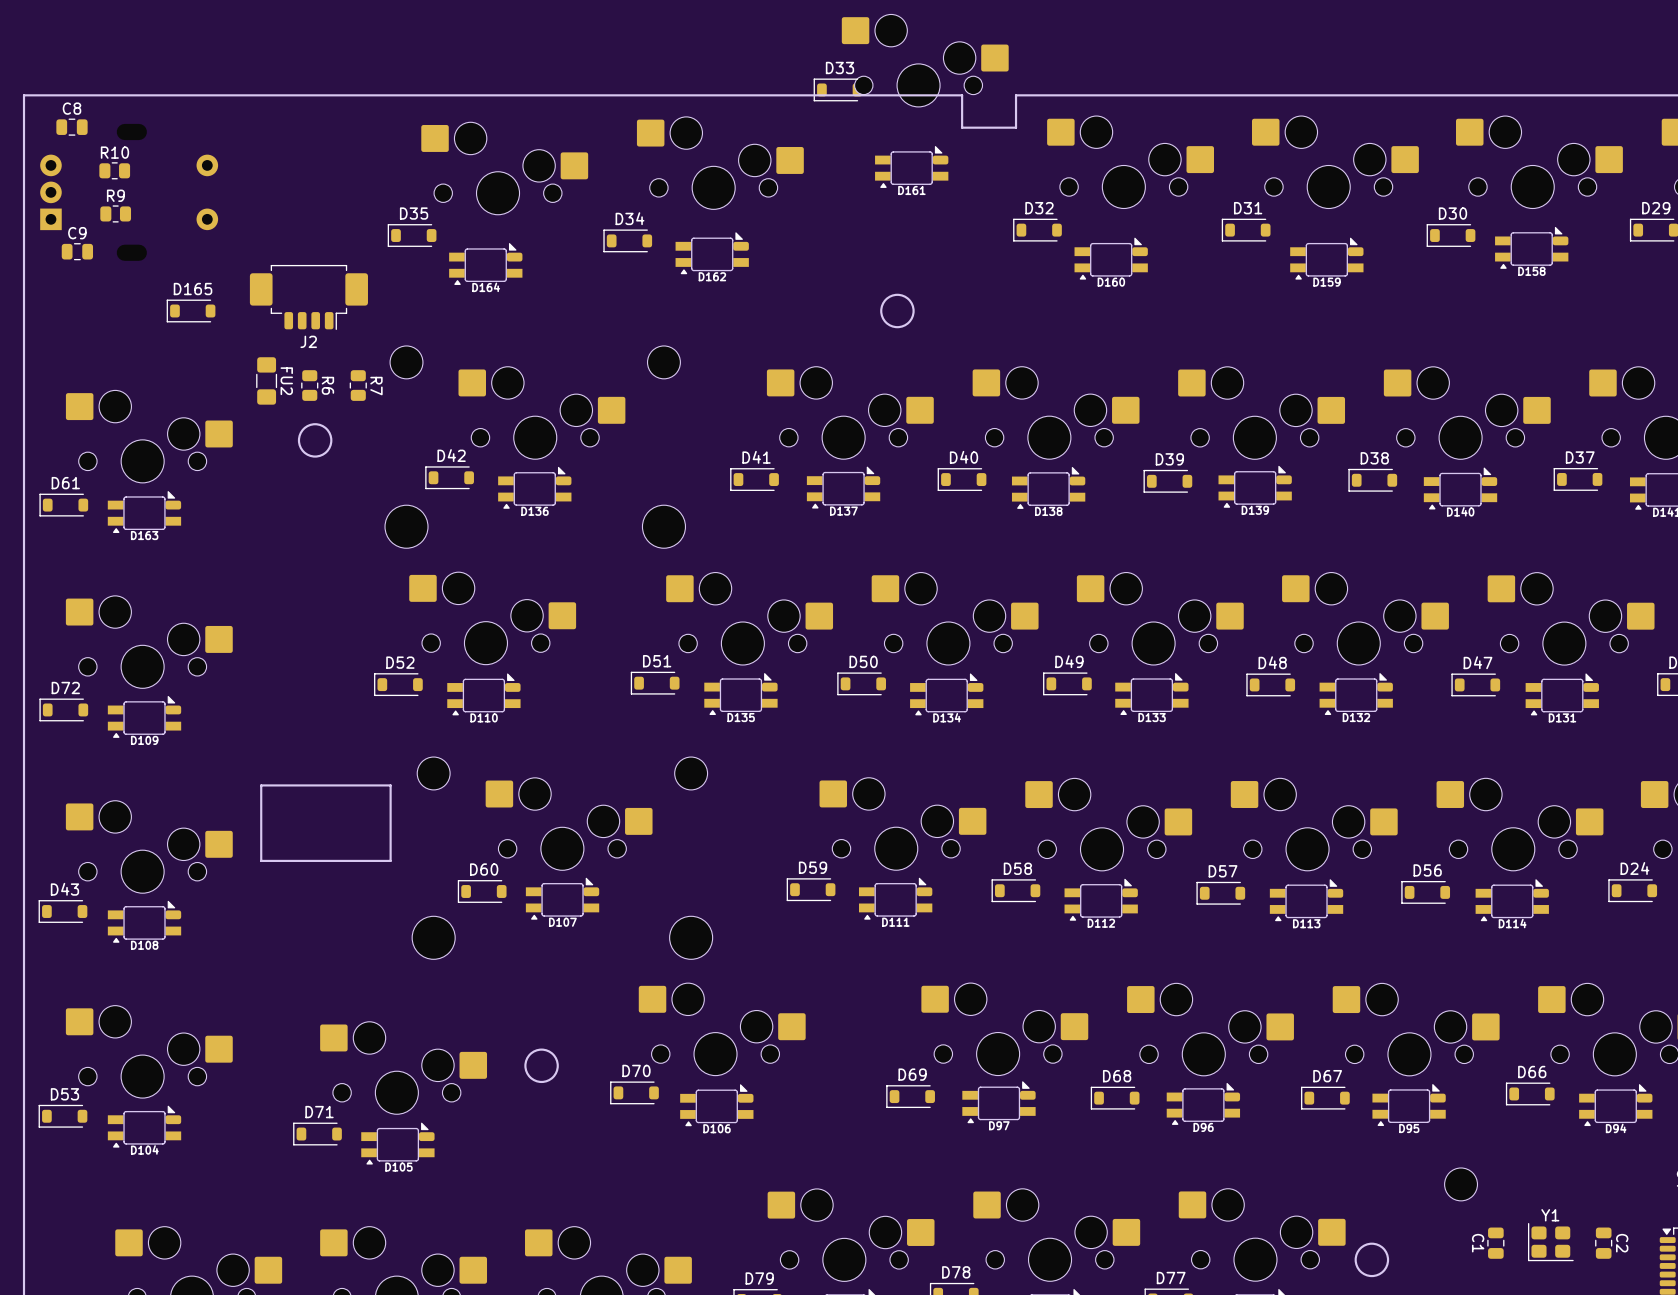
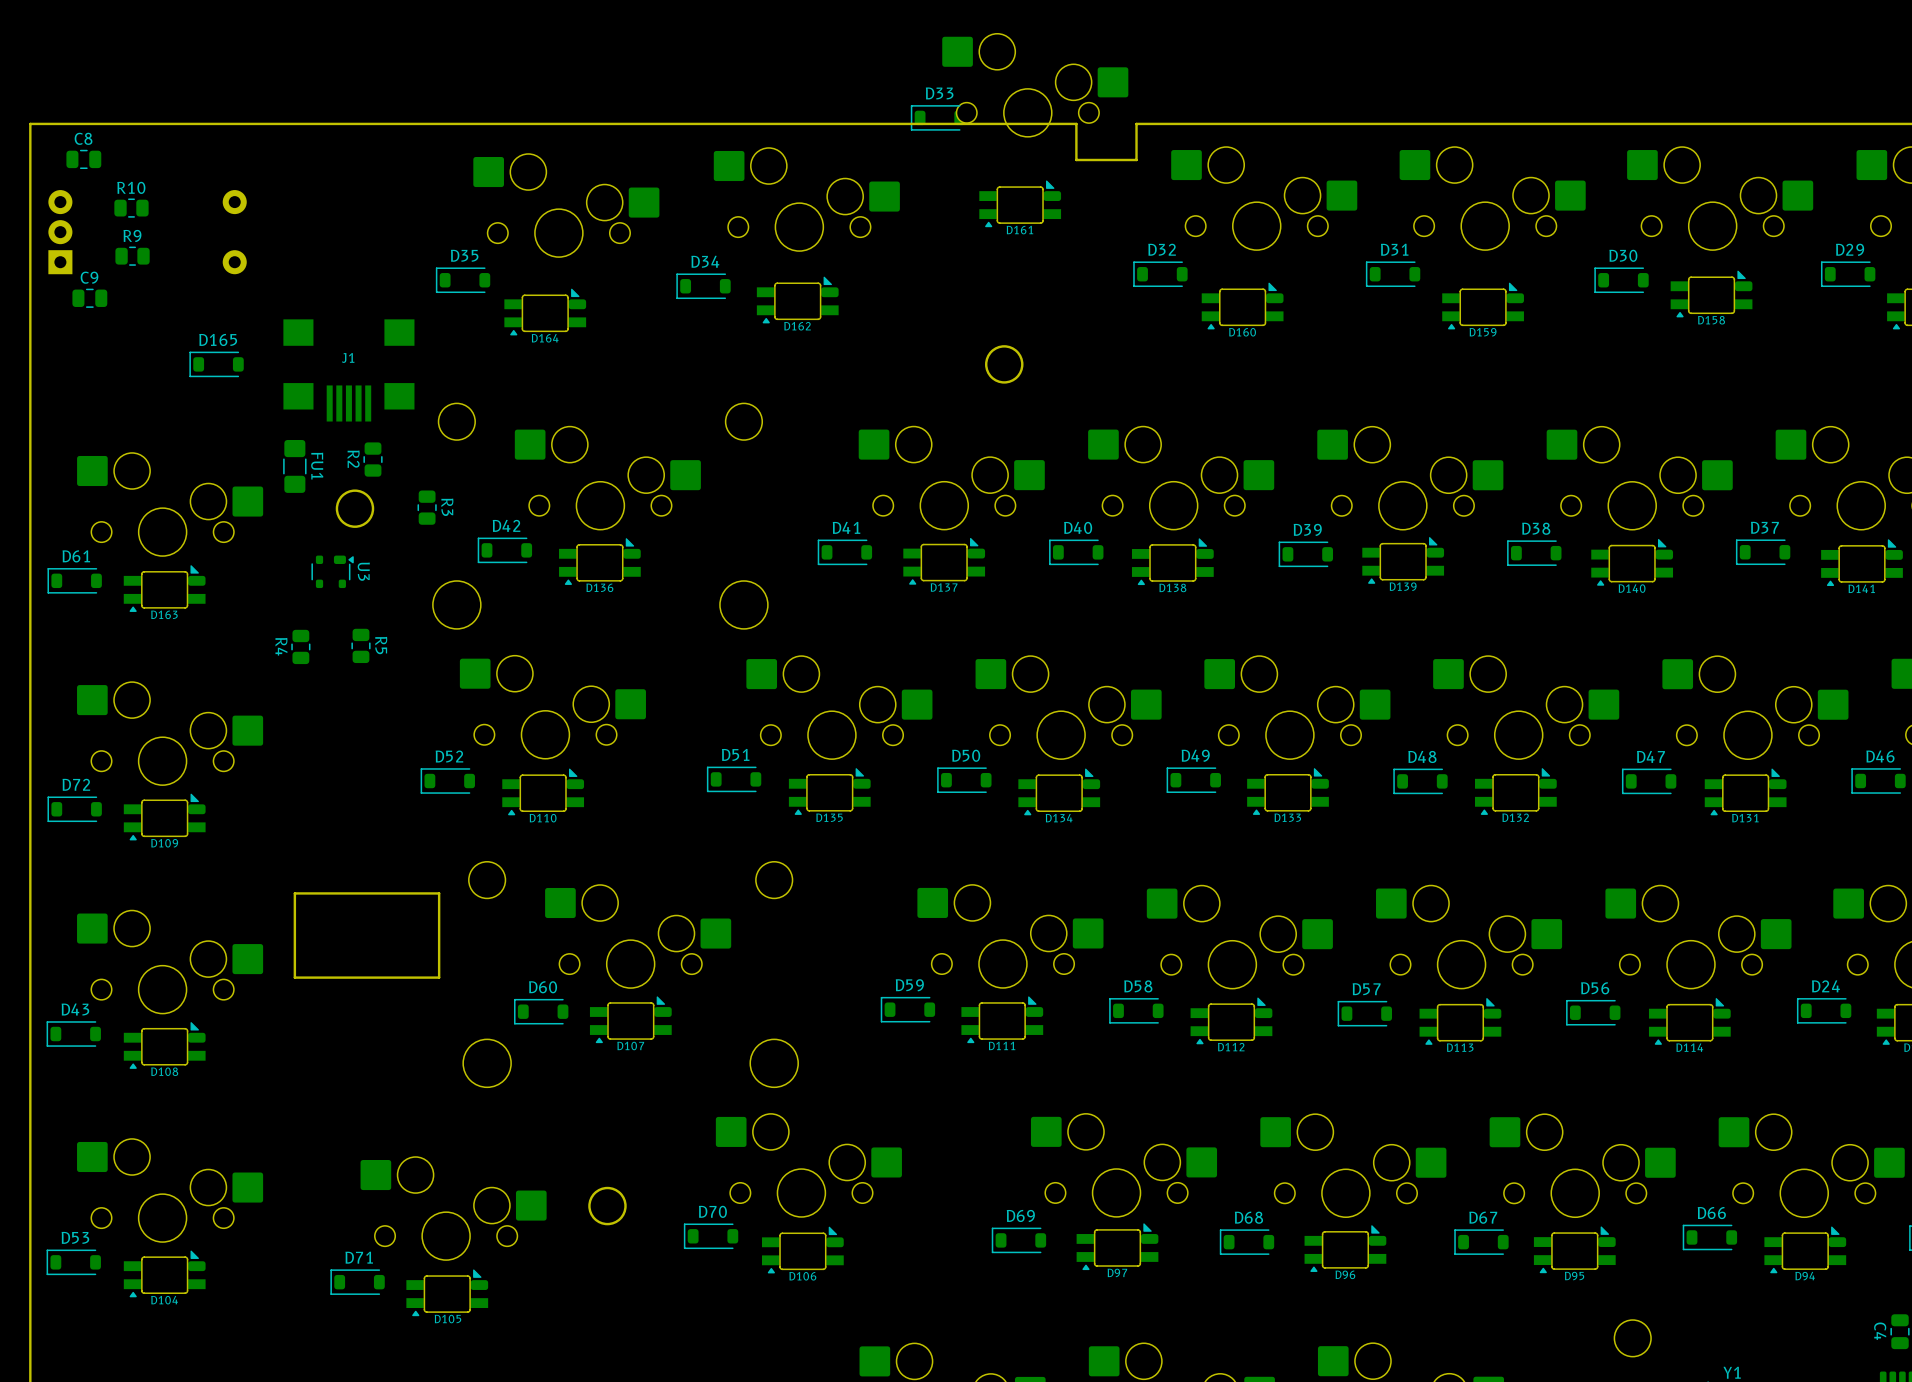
J2: (308, 297) -> none
J1: none -> (348, 370)
FU2: (266, 380) -> none
R6: (309, 385) -> none
R7: (358, 385) -> none
R2: none -> (373, 459)
FU1: none -> (294, 466)
R3: none -> (427, 507)
U3: none -> (332, 571)
R5: none -> (360, 645)
R4: none -> (300, 646)

